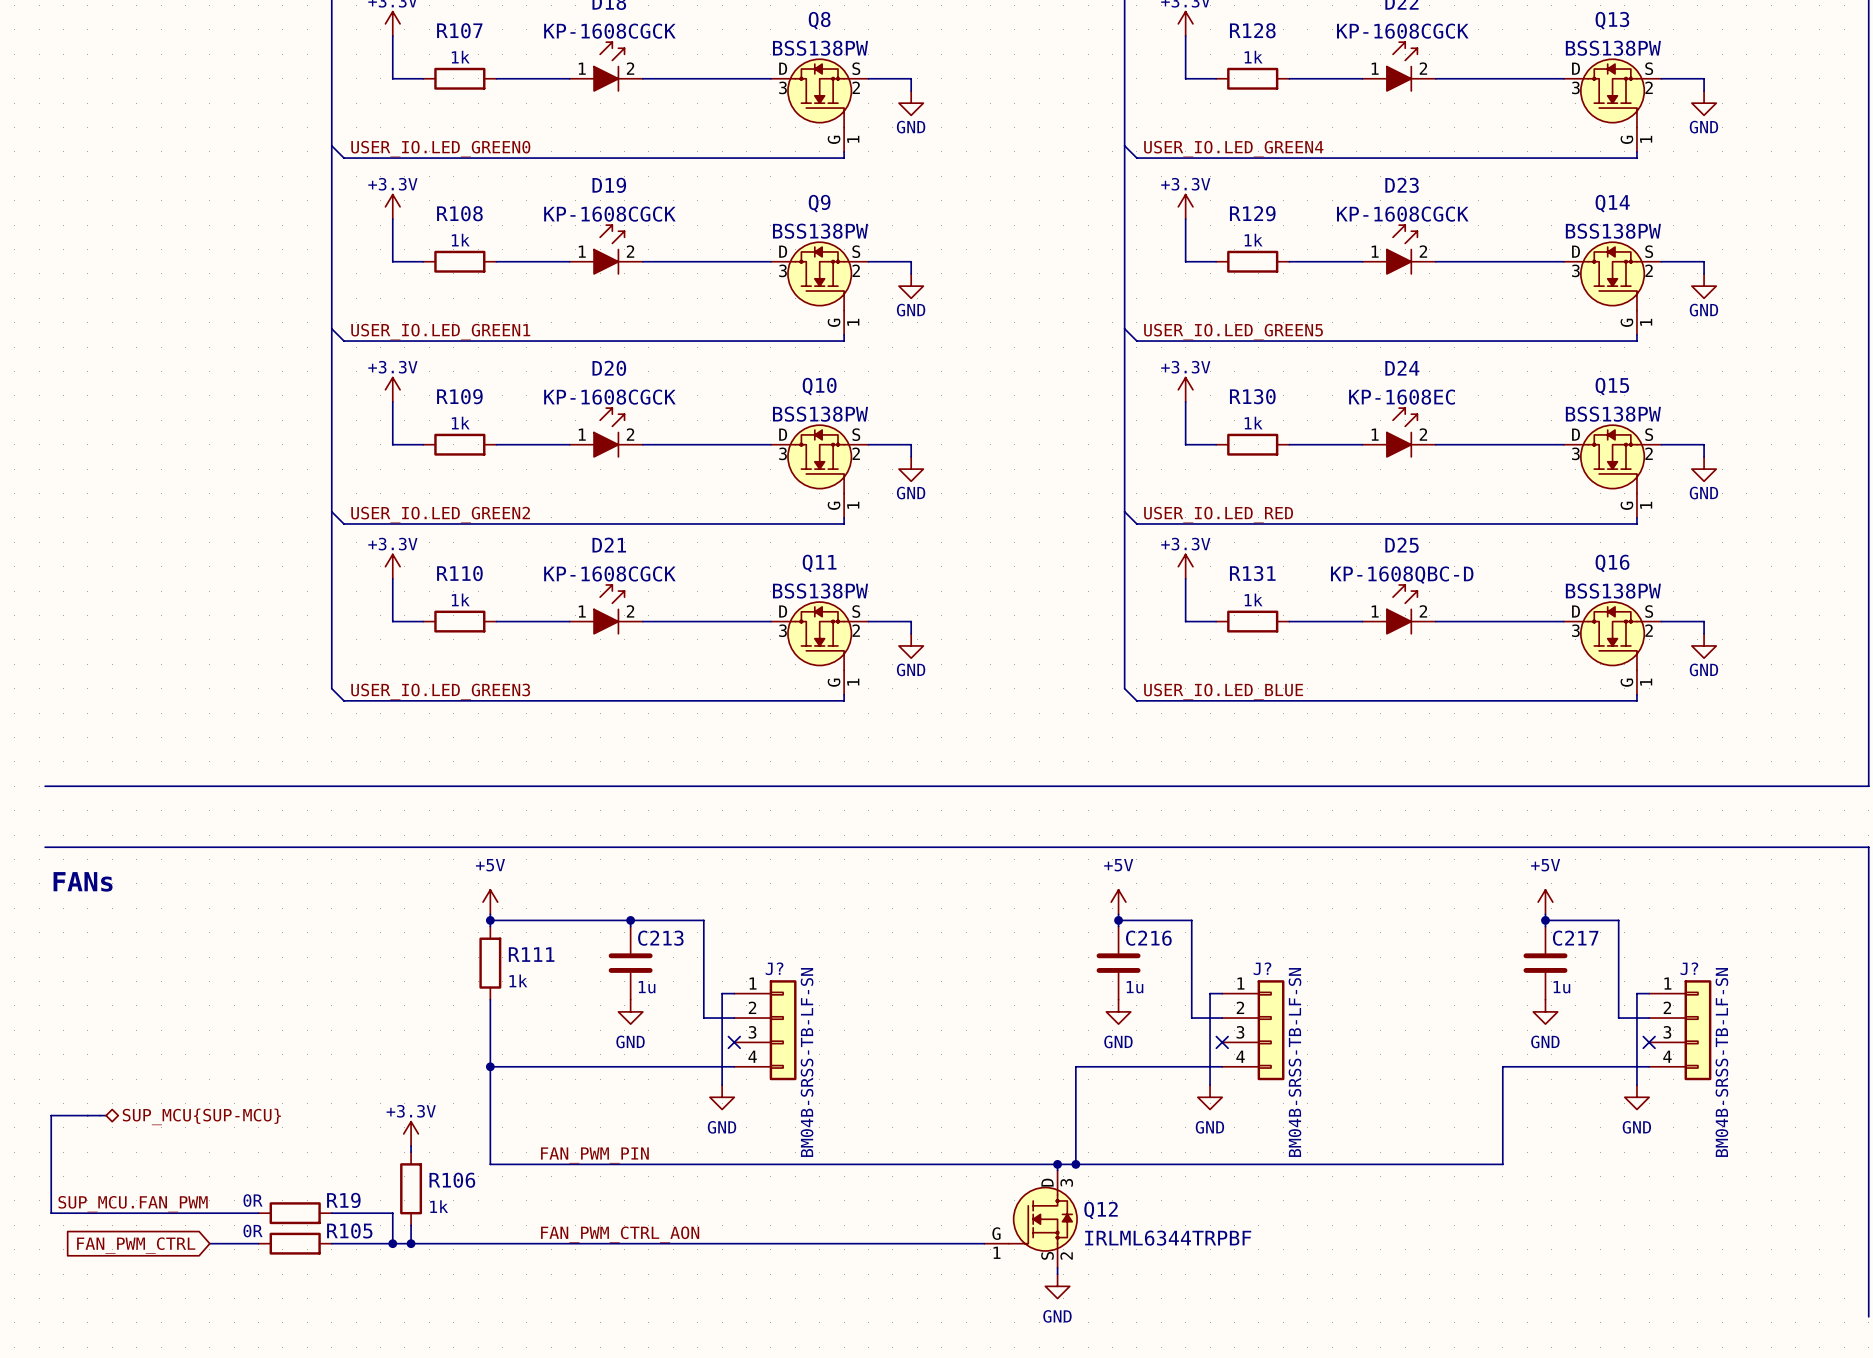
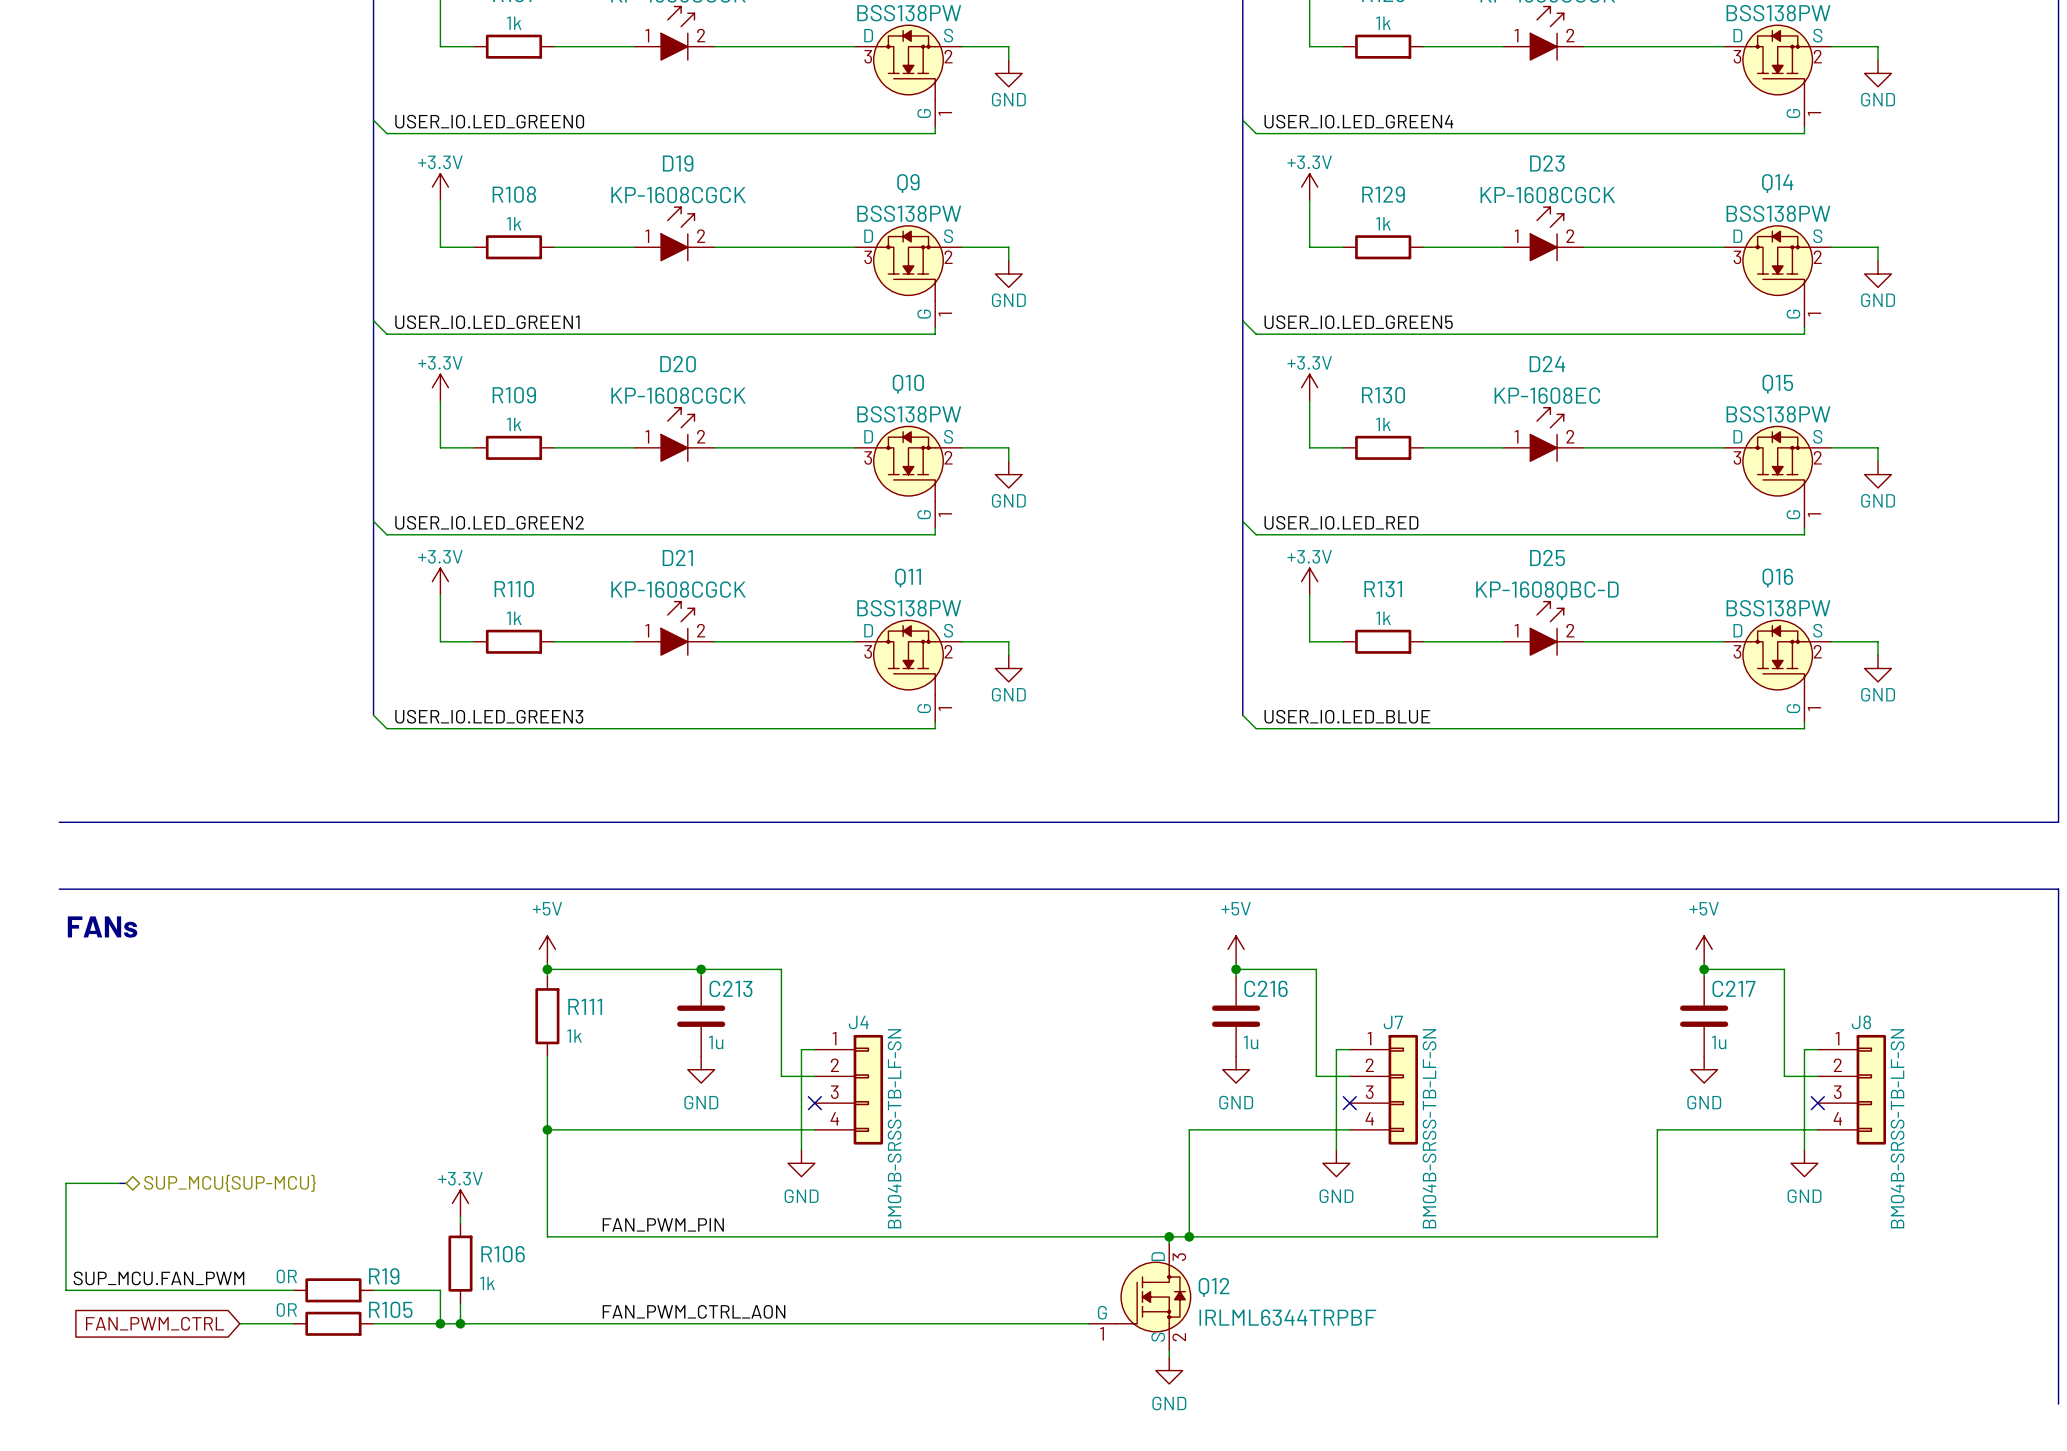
J? name: J? (774, 968) -> J4 (858, 1022)
J? name: J? (1262, 968) -> J7 (1393, 1022)
J? name: J? (1689, 968) -> J8 (1861, 1022)

